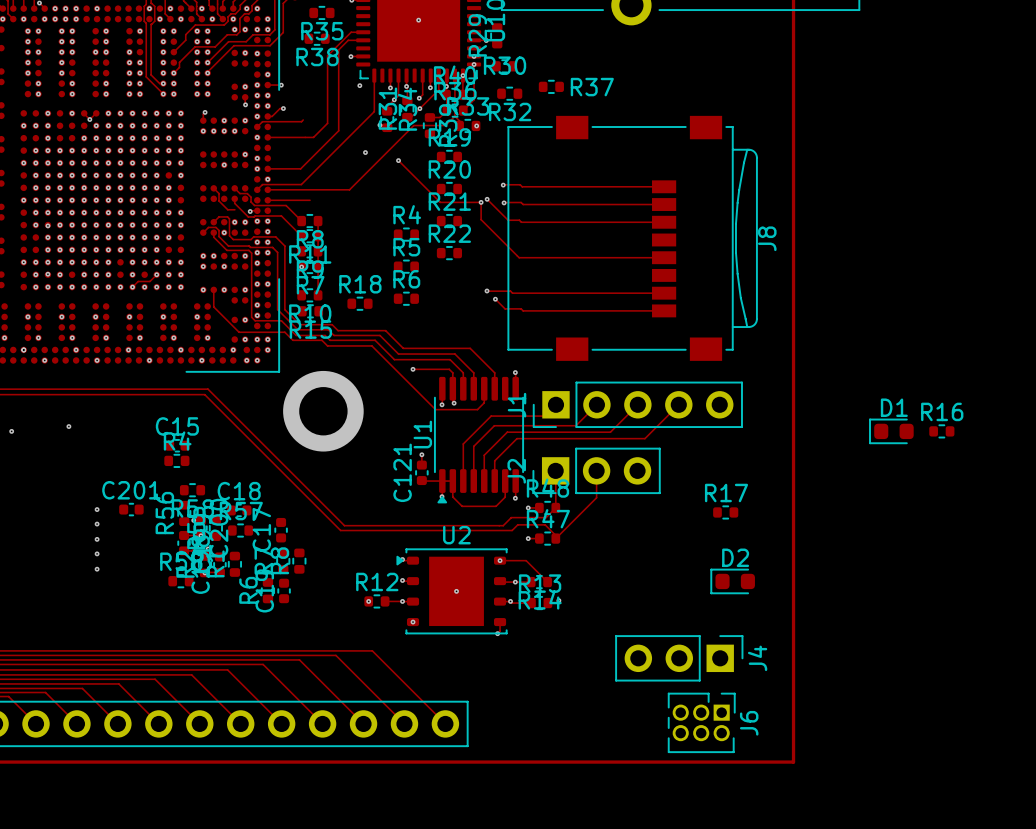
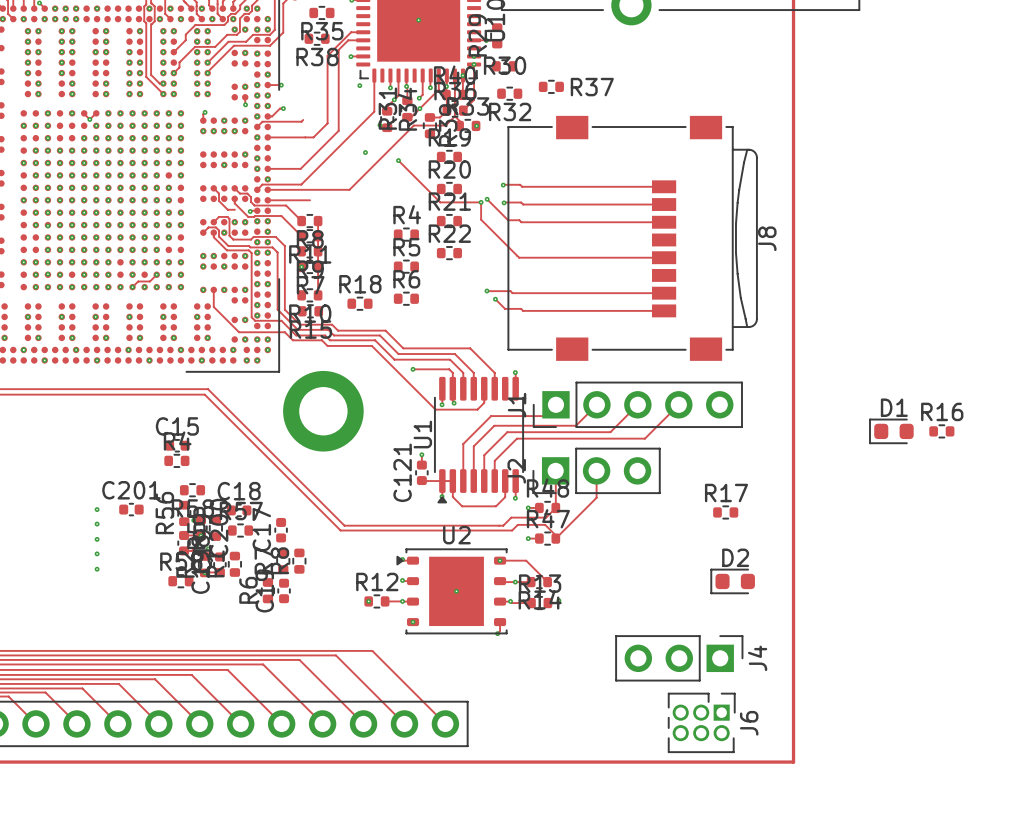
via: (68, 426) -> none
via: (11, 431) -> none

